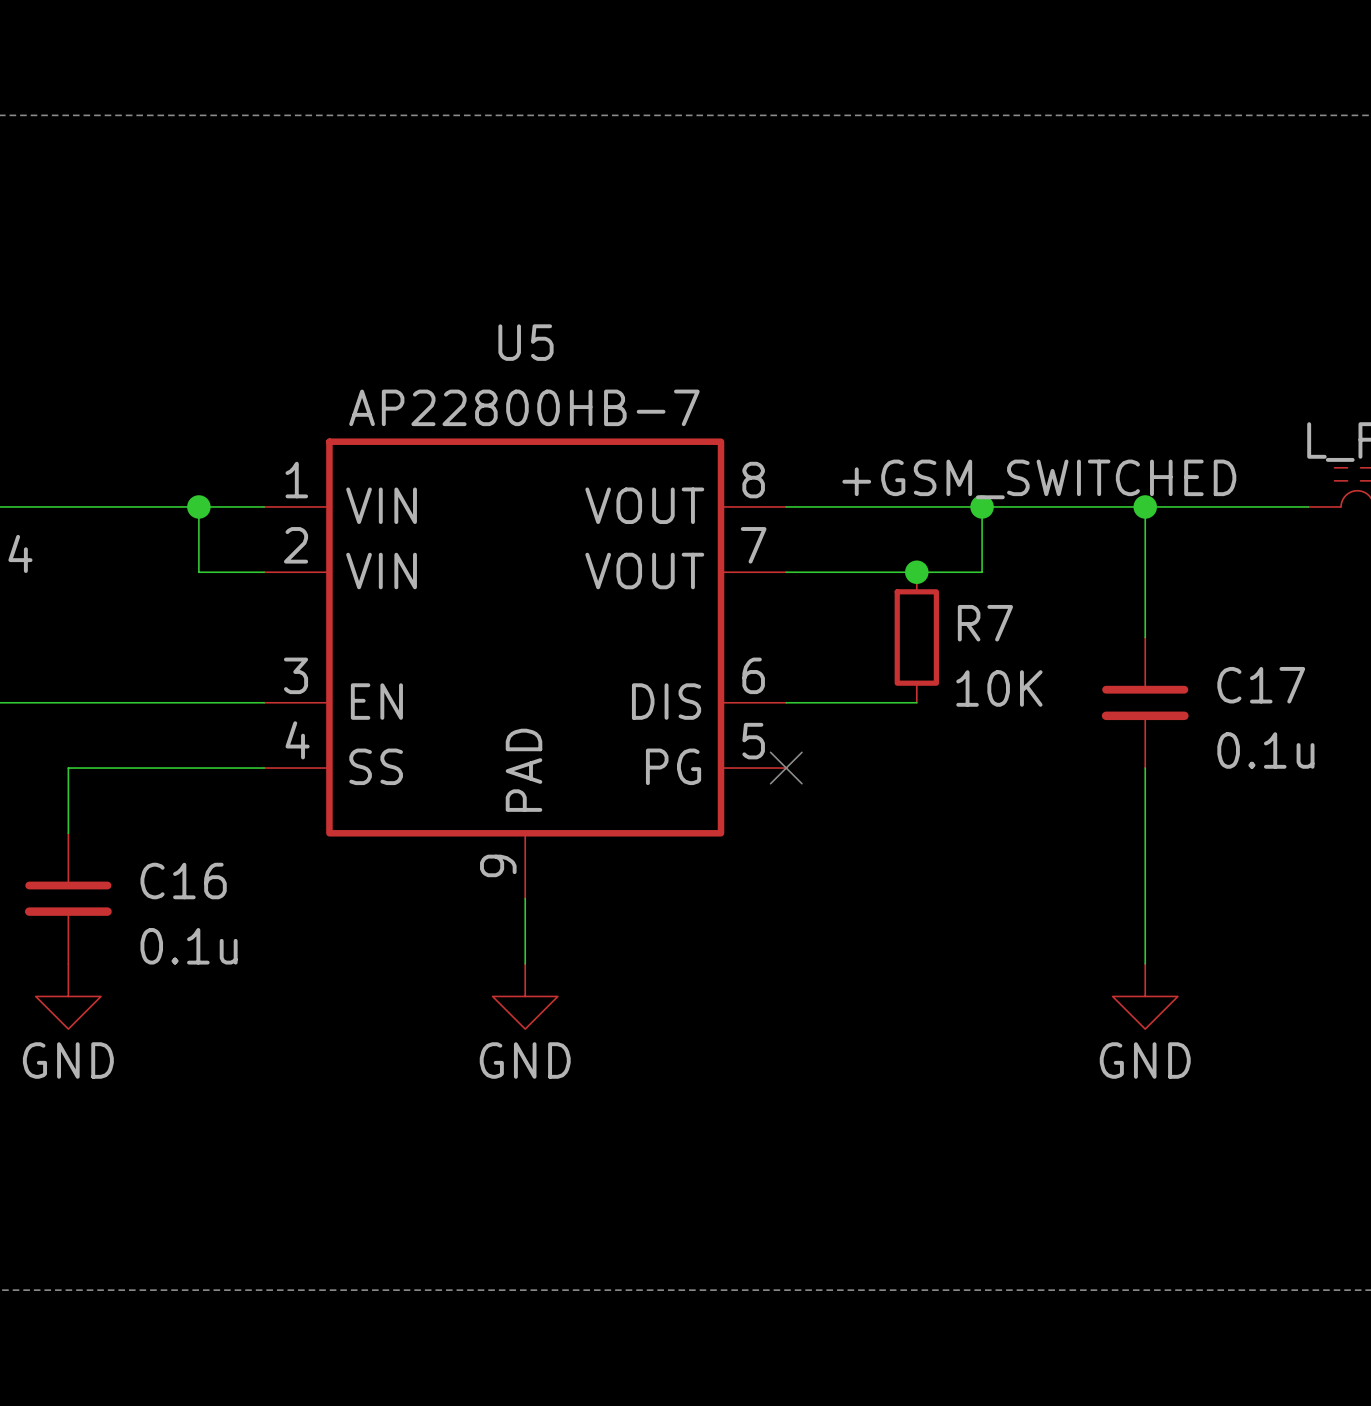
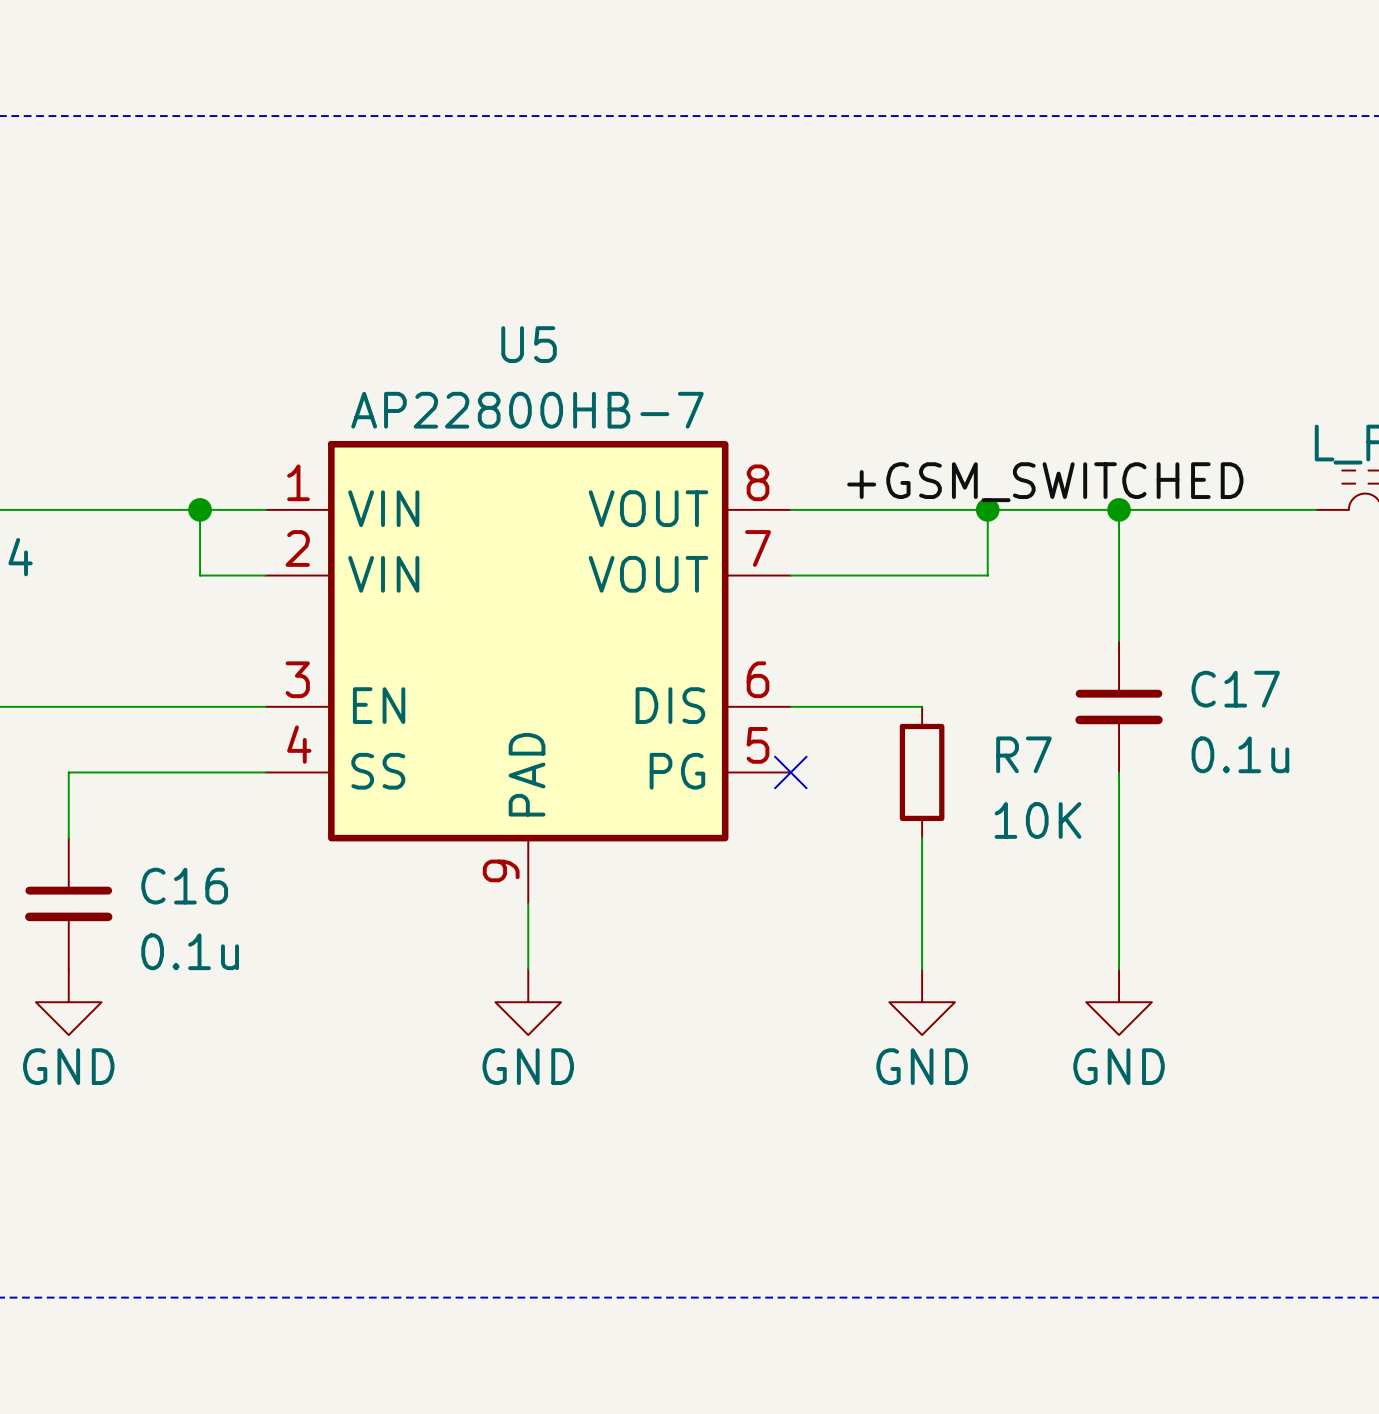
wire: (1145, 506) (1145, 637) -> (1119, 509) (1119, 641)
junction position: (1145, 506) -> (1119, 509)
junction: (916, 572) -> none
R7 name position: R7 (985, 623) -> R7 (1023, 754)
R7 position: (916, 637) -> (922, 772)
R7 value position: 10K (999, 688) -> 10K (1038, 820)
C17 position: (1145, 702) -> (1119, 706)
wire: (1145, 768) (1145, 963) -> (1119, 772) (1119, 969)
wire: none -> (922, 838) (922, 969)
power symbol: none -> GND (922, 1002)
power symbol position: GND (1145, 996) -> GND (1119, 1002)

